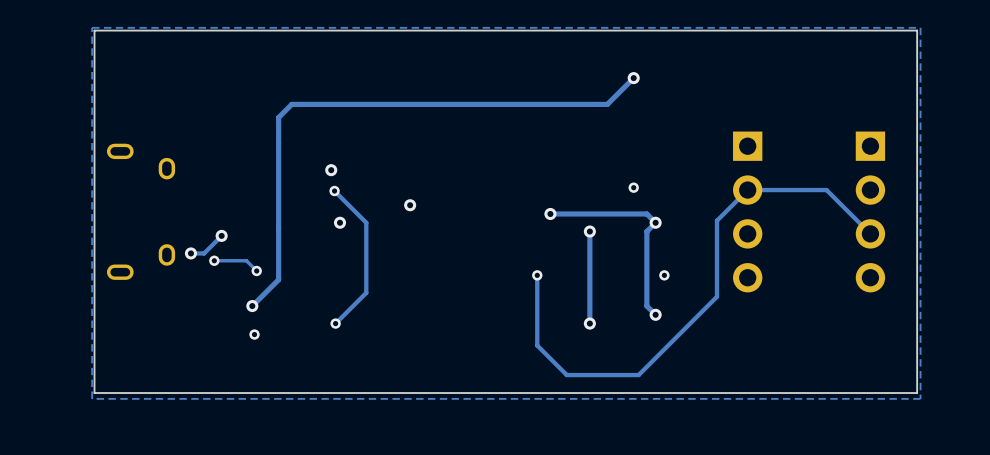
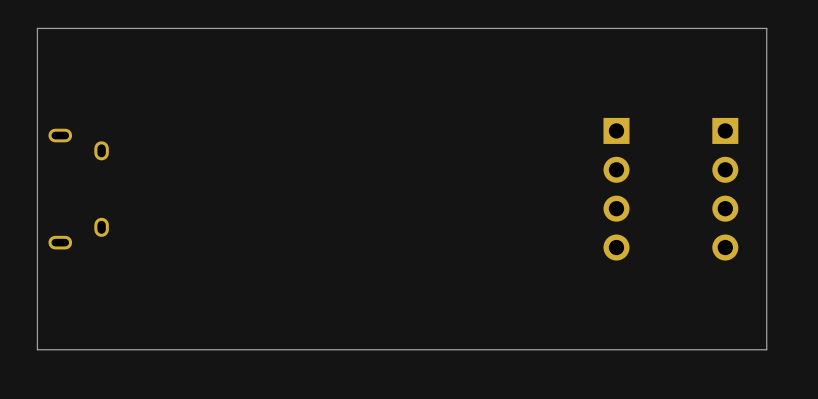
zone outline: (920, 27) (92, 27) (92, 398) (920, 398) (920, 27) -> none
track: (633, 78) (607, 104) (291, 104) (278, 117) (278, 279) (252, 306) -> none
via: (633, 78) -> none
via: (331, 170) -> none
via: (633, 187) -> none
track: (334, 191) (366, 222) (366, 292) (335, 323) -> none
via: (334, 191) -> none
via: (410, 205) -> none
track: (550, 213) (646, 213) (655, 222) (646, 231) (646, 306) (655, 314) -> none
via: (550, 213) -> none
via: (340, 222) -> none
via: (655, 222) -> none
track: (589, 231) (589, 323) -> none
via: (589, 231) -> none
track: (870, 233) (826, 190) (747, 190) (717, 220) (717, 296) (638, 375) (566, 375) (537, 345) (537, 275) -> none
track: (221, 235) (204, 253) (190, 253) -> none
via: (221, 235) -> none
via: (190, 253) -> none
track: (214, 260) (246, 260) (256, 270) -> none
via: (214, 260) -> none
via: (256, 270) -> none
via: (537, 275) -> none
via: (664, 275) -> none
via: (252, 306) -> none
via: (655, 314) -> none
via: (335, 323) -> none
via: (589, 323) -> none
via: (254, 334) -> none

